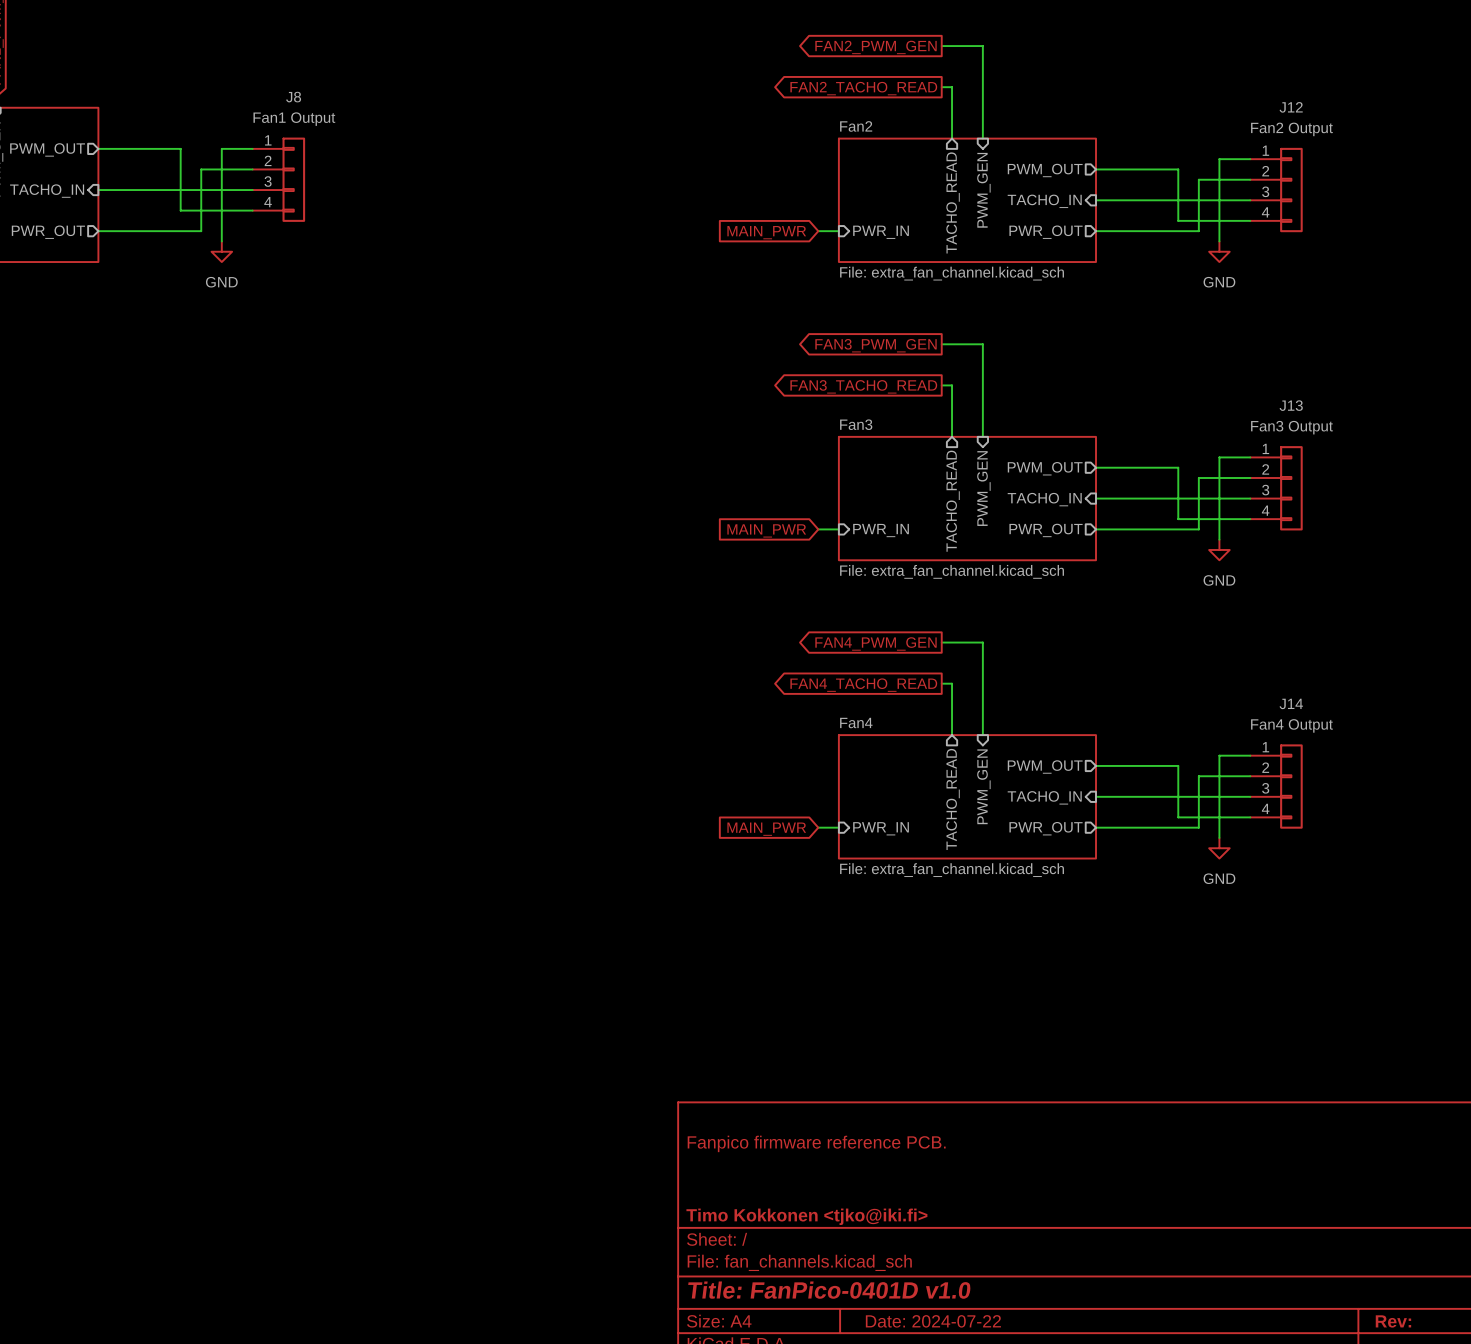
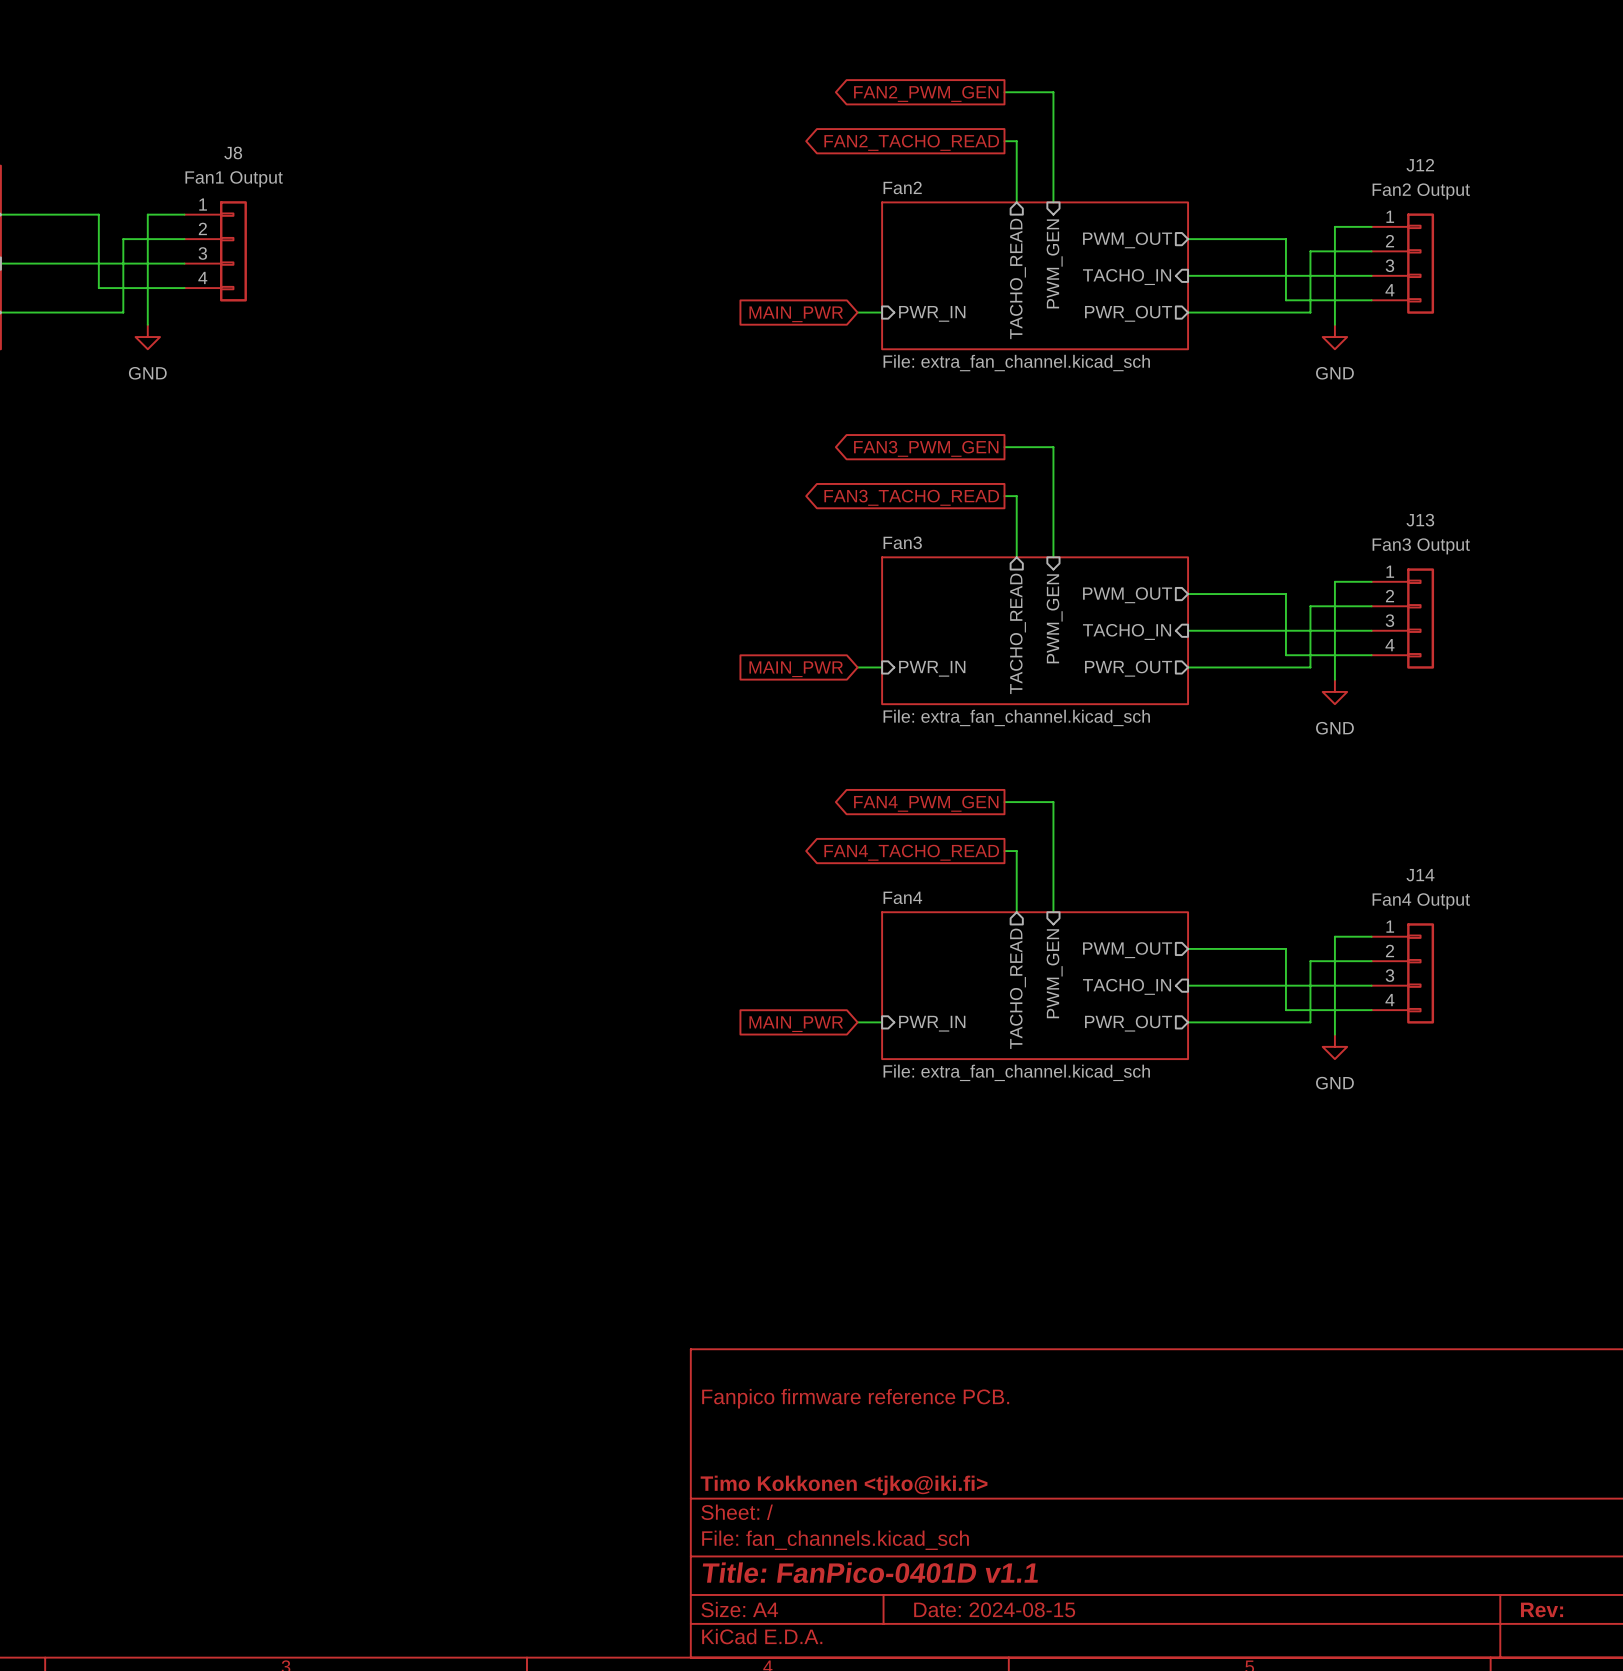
title block: Title: FanPico-0401D v1.0 (829, 1290) -> Title: FanPico-0401D v1.1 (870, 1572)
title block: Date: 2024-07-22 (933, 1321) -> Date: 2024-08-15 (994, 1609)

